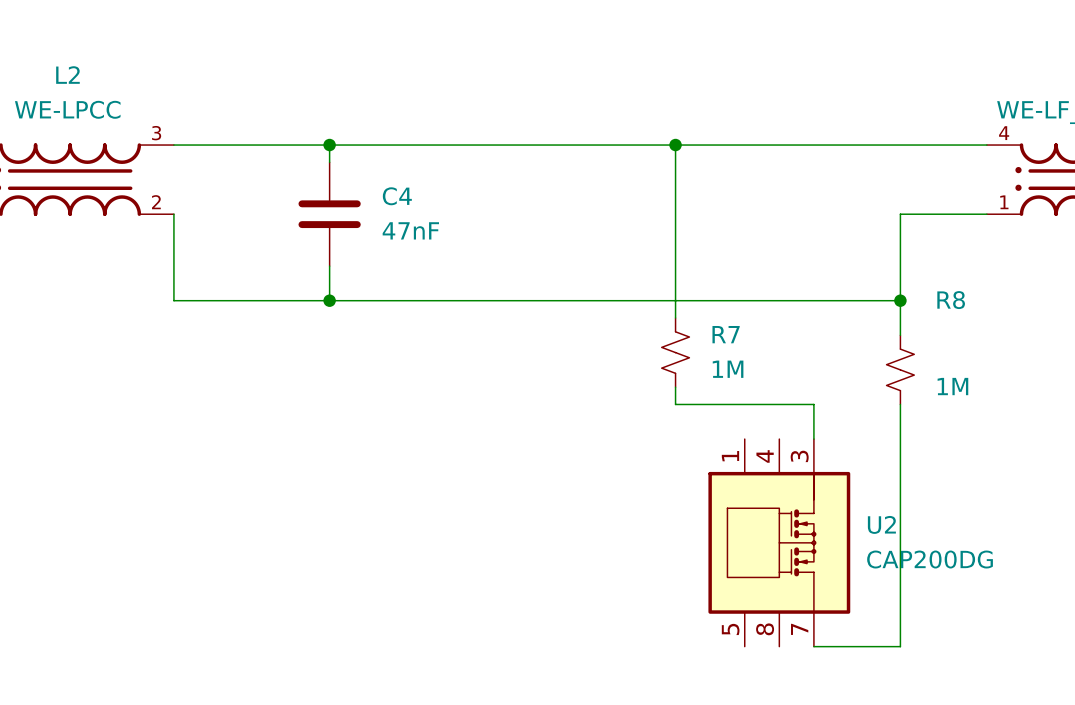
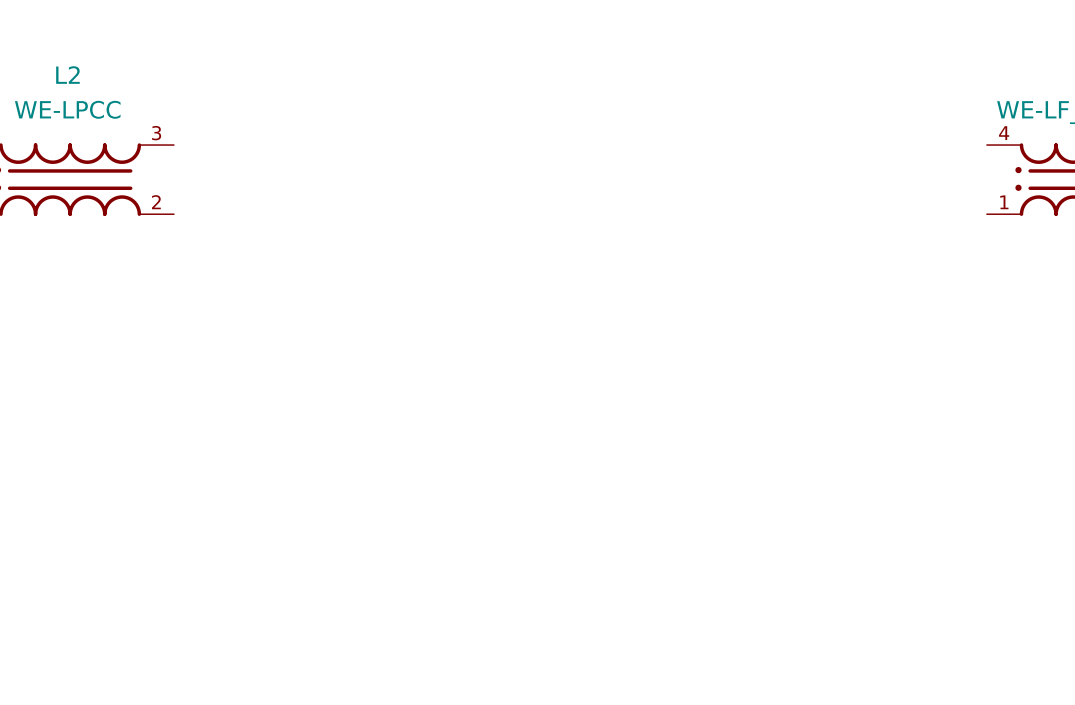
wire: (173, 145) (986, 145) -> none
wire: (329, 145) (329, 162) -> none
junction: (329, 145) -> none
wire: (675, 145) (675, 317) -> none
junction: (675, 145) -> none
wire: (173, 214) (173, 300) (900, 300) -> none
C4: 47nF (329, 214) -> none
wire: (986, 214) (900, 214) (900, 335) -> none
wire: (329, 266) (329, 300) -> none
junction: (329, 300) -> none
junction: (900, 300) -> none
R7: 1M (675, 352) -> none
R8: 1M (900, 369) -> none
wire: (675, 387) (675, 404) (813, 404) (813, 439) -> none
wire: (900, 404) (900, 646) (813, 646) -> none
U2: CAP200DG (779, 542) -> none

